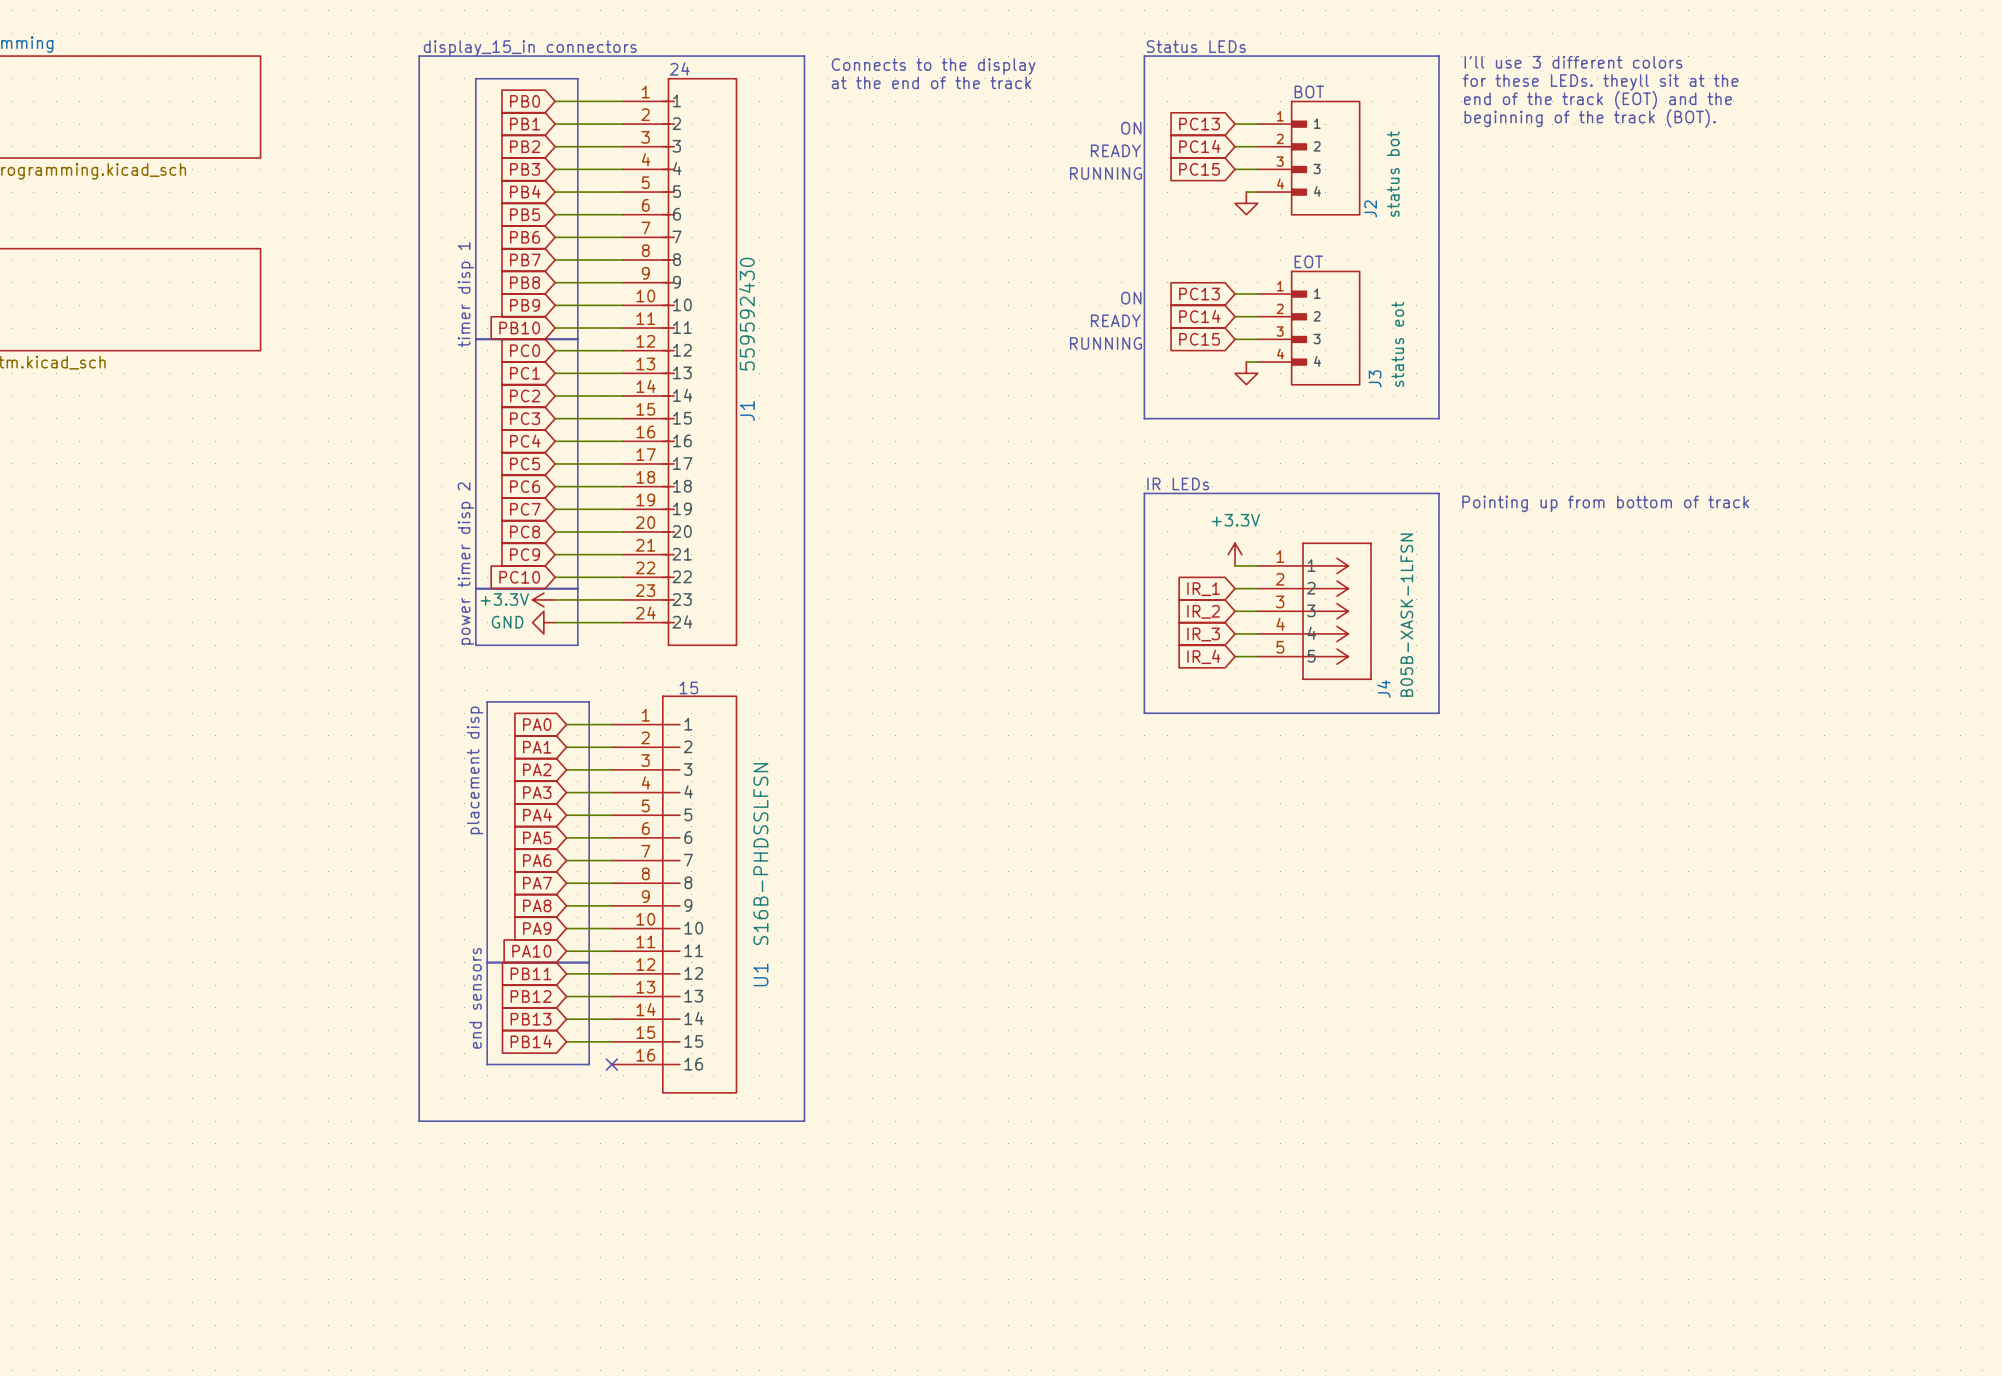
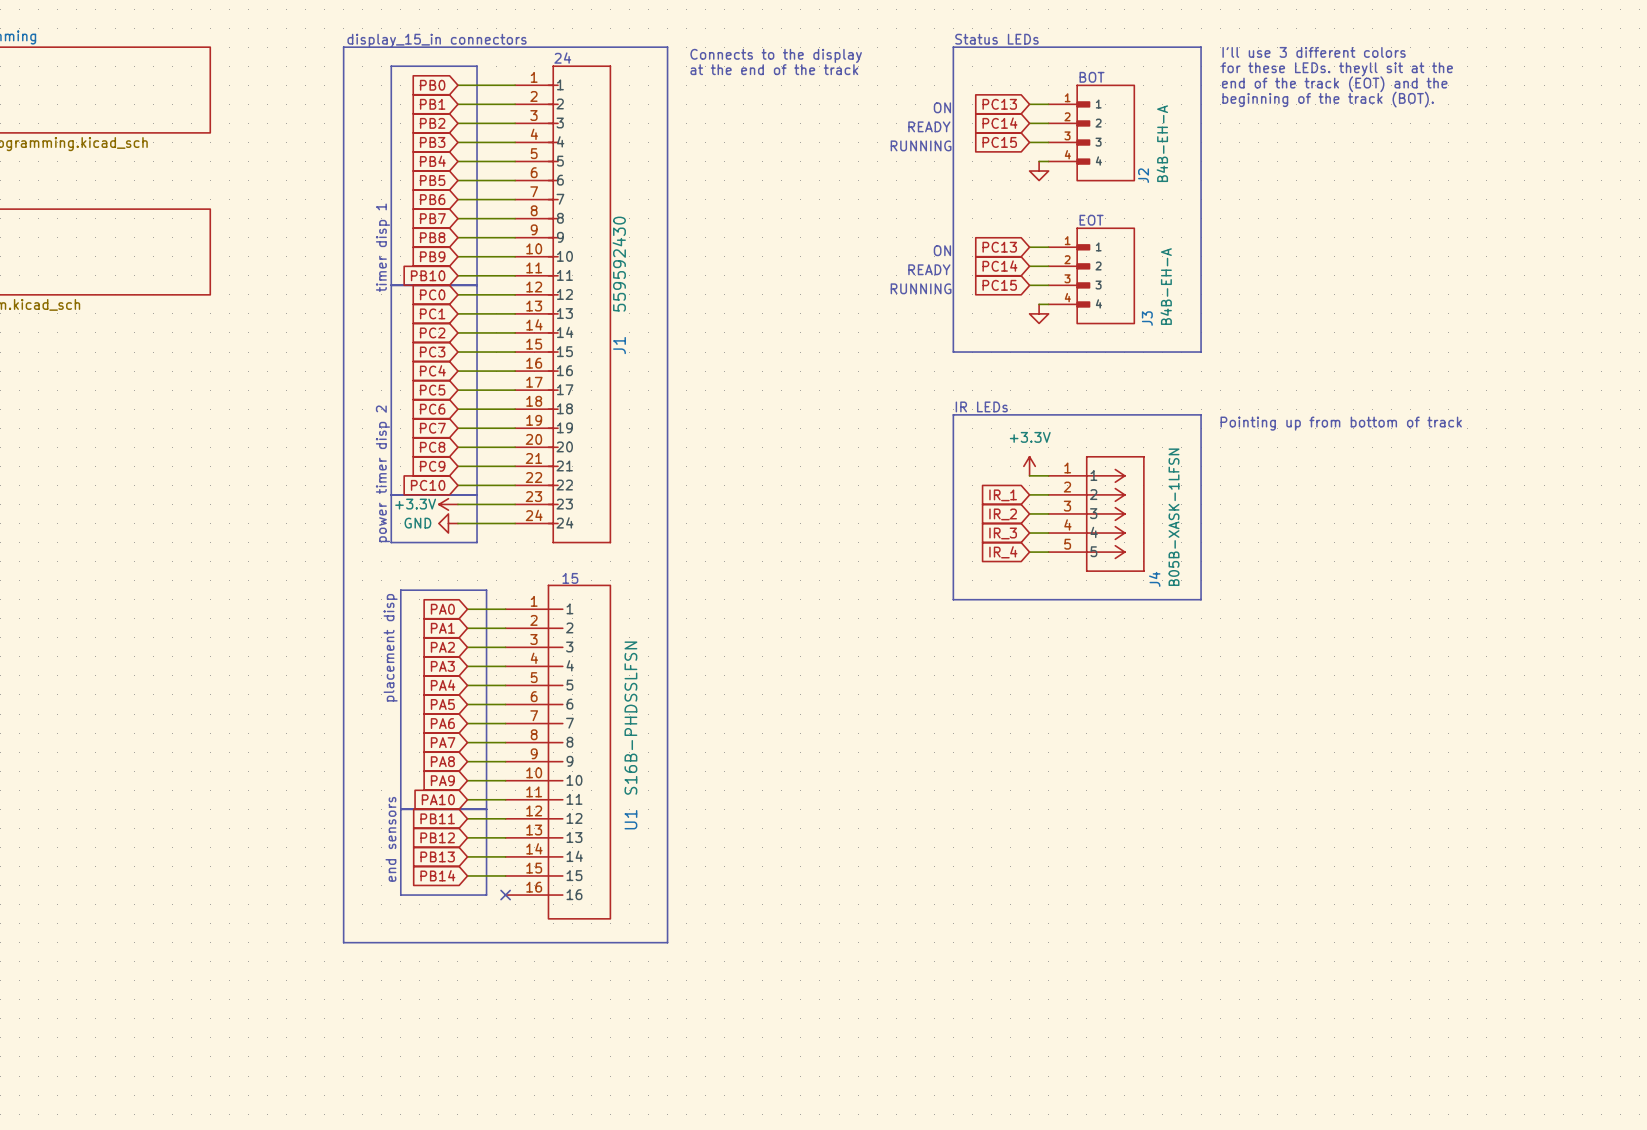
J2 value: status bot (1393, 174) -> B4B-EH-A (1162, 143)
J3 value: status eot (1397, 344) -> B4B-EH-A (1166, 286)

